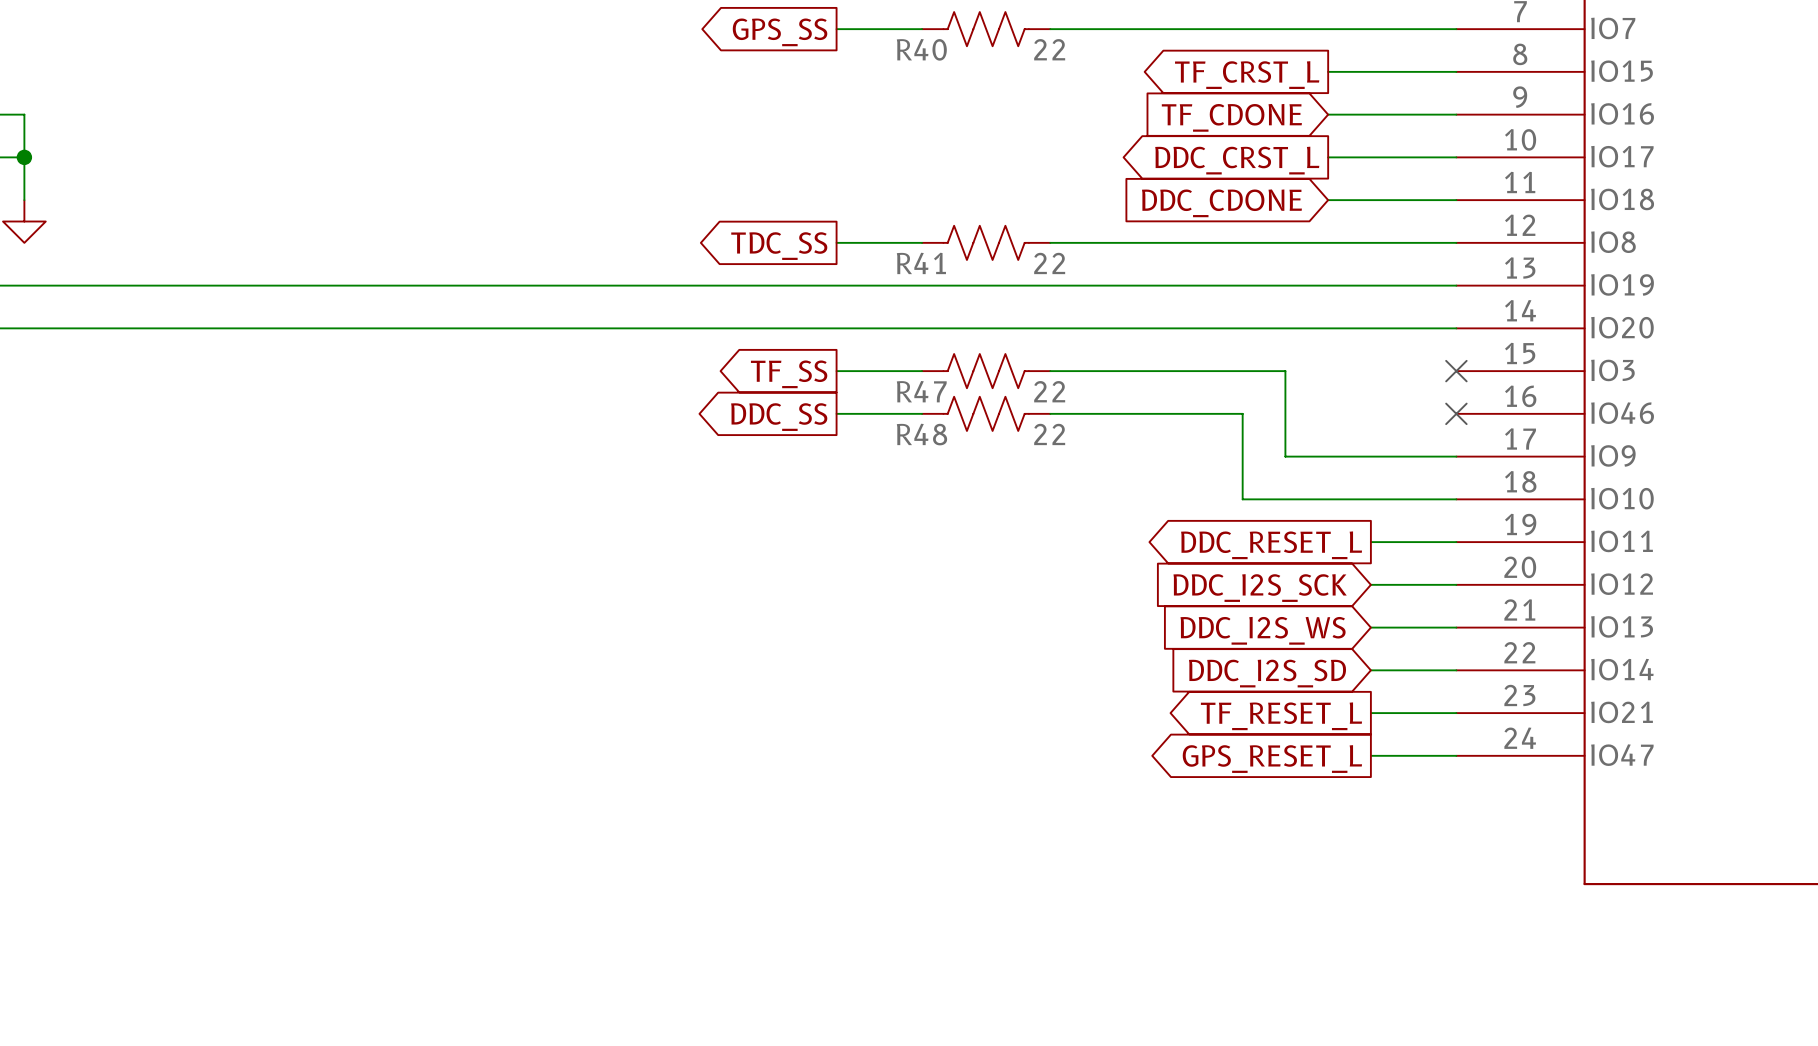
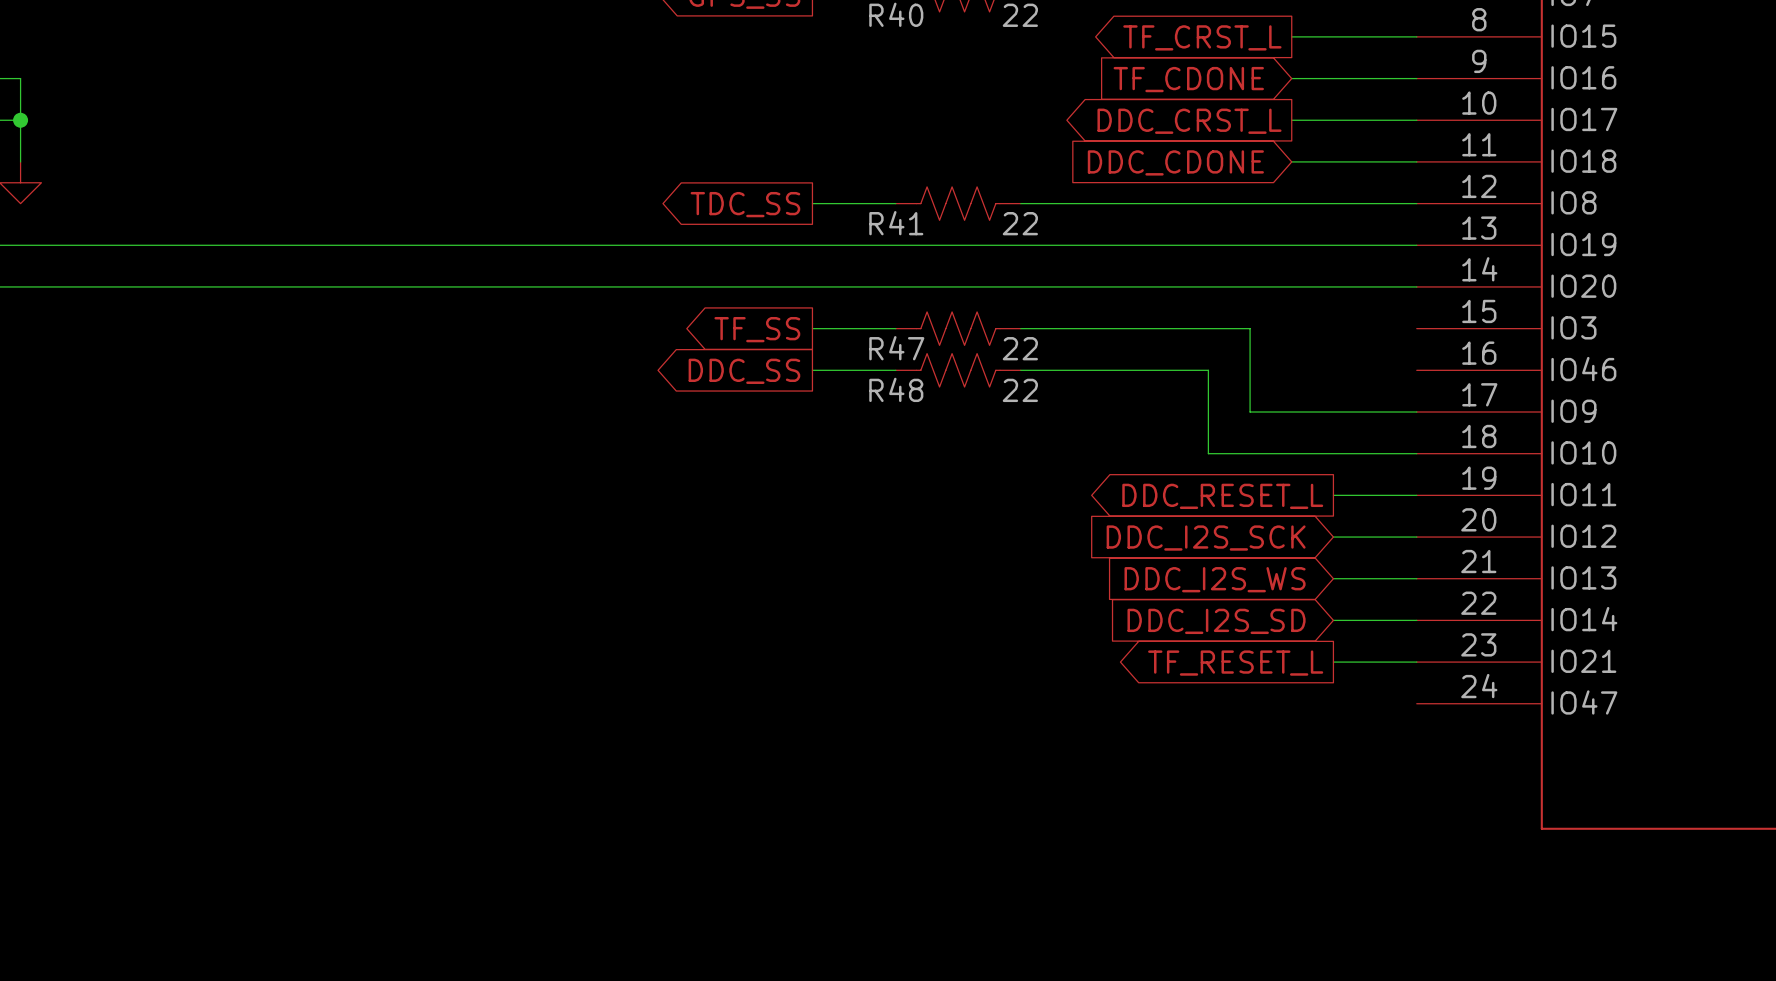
no-connect mark: (1456, 371) -> none
no-connect mark: (1456, 413) -> none
wire: (1370, 755) (1456, 755) -> none
global label: GPS_RESET_L (1272, 759) -> none

